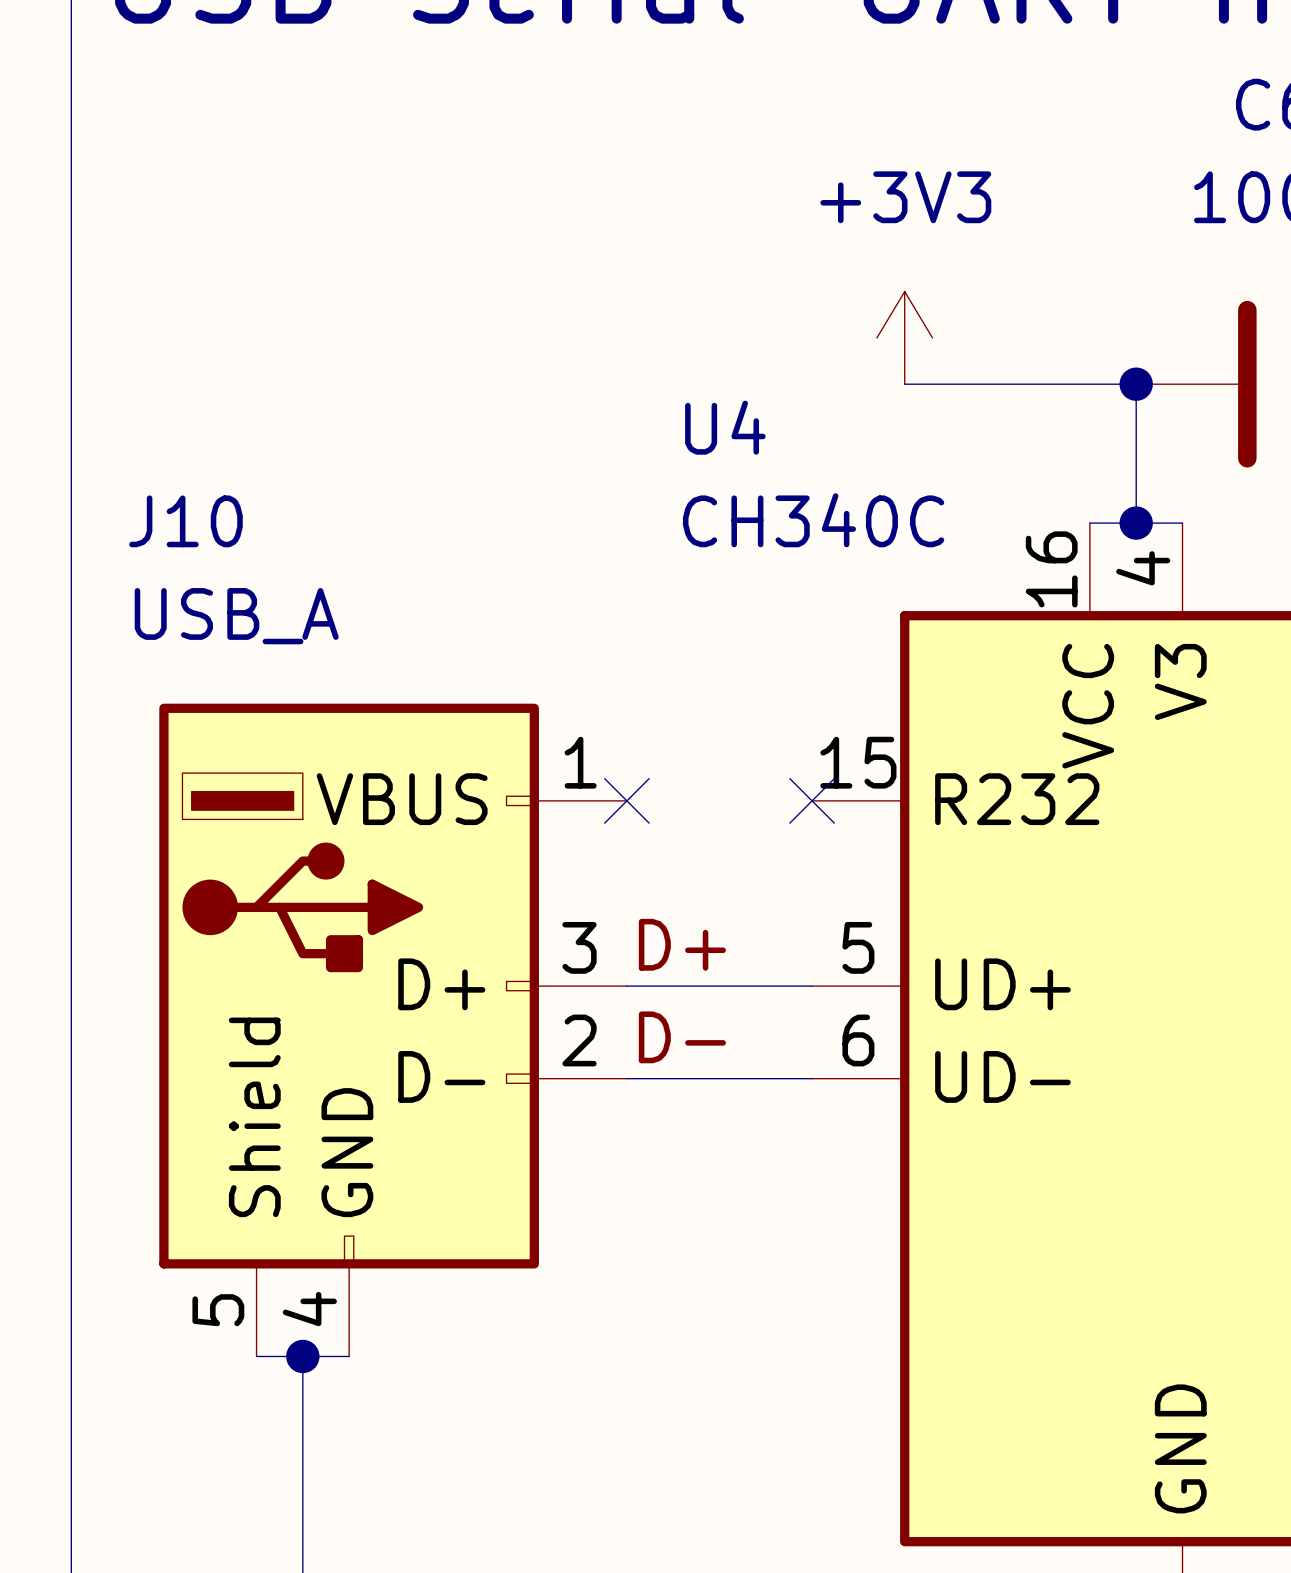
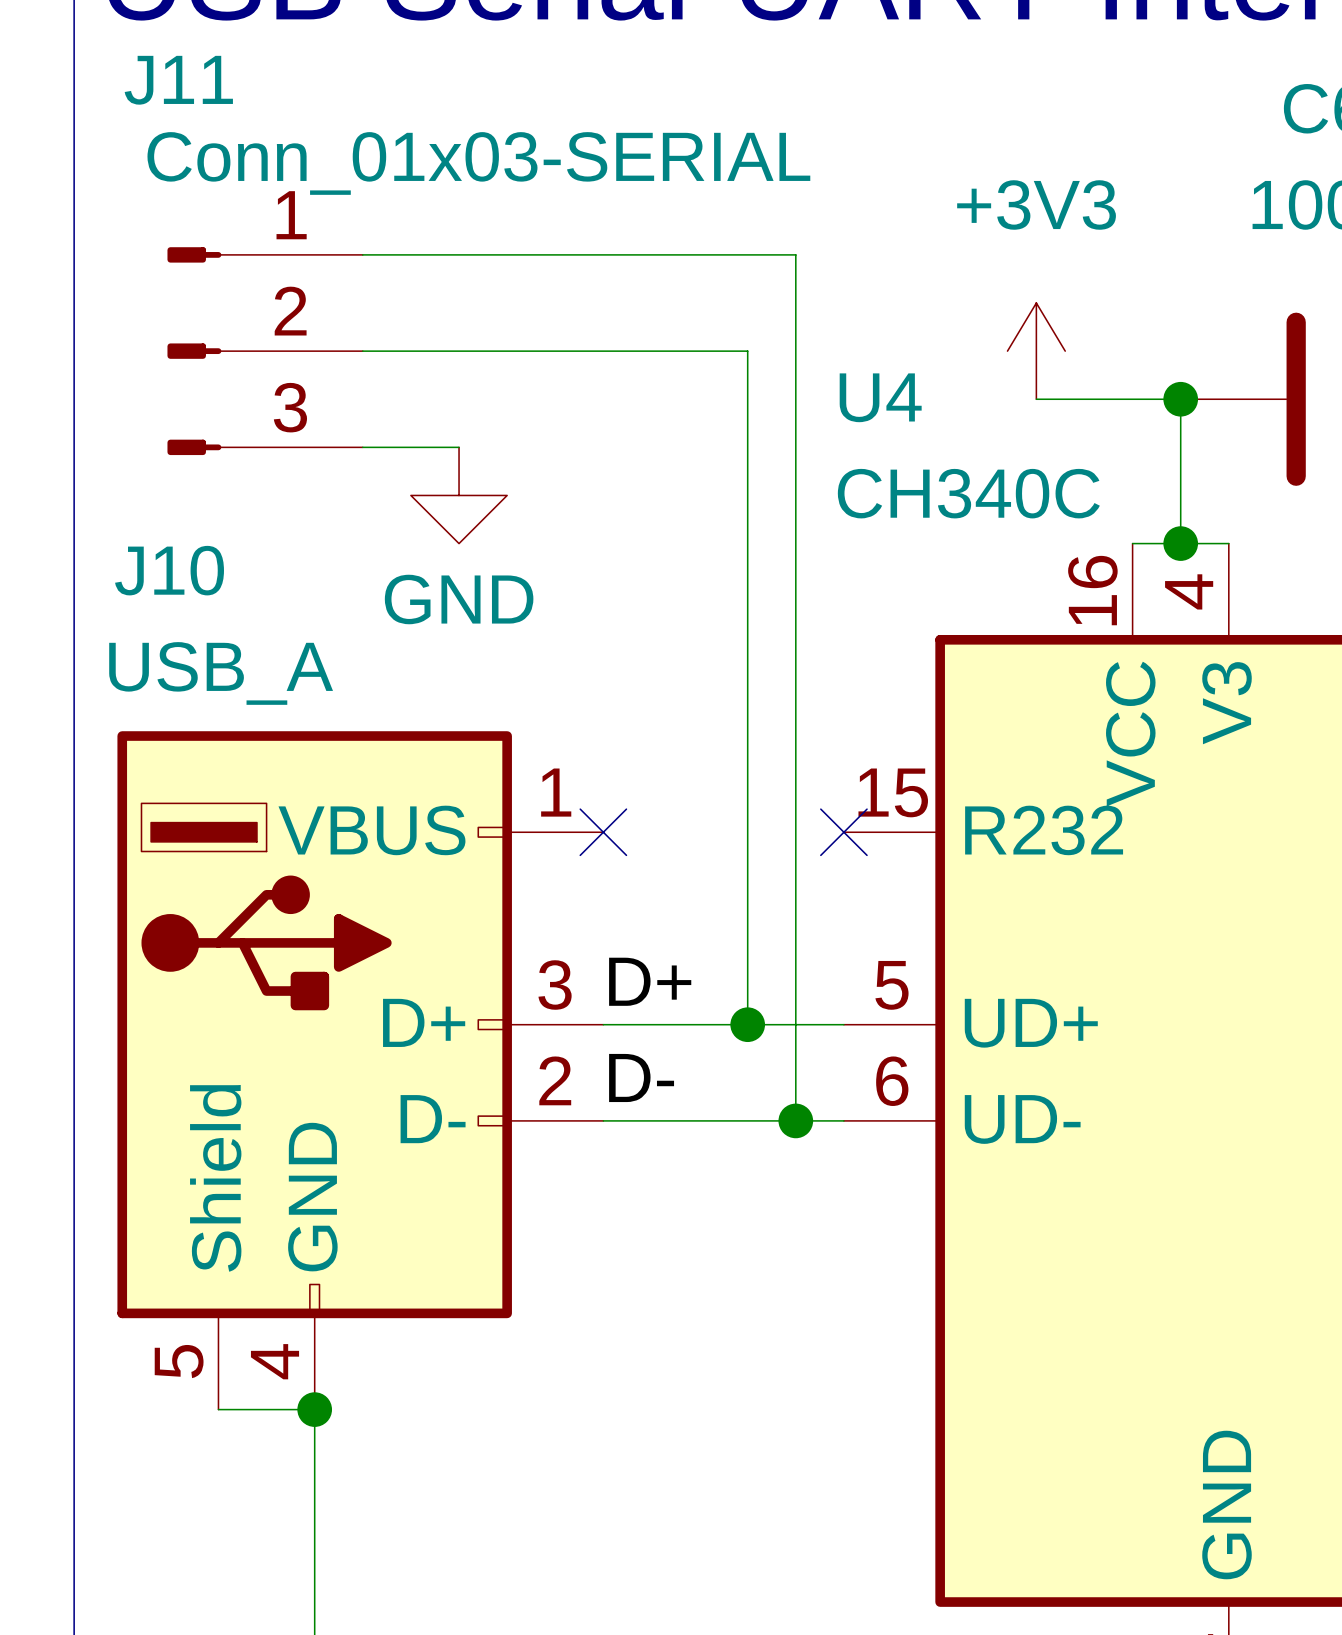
wire: none -> (362, 254) (795, 254) (795, 1120)
J11: none -> Conn_01x03-SERIAL (265, 351)
wire: none -> (362, 351) (747, 351) (747, 1024)
power symbol position: +3V3 (904, 337) -> +3V3 (1036, 351)
wire: (904, 384) (997, 384) -> (362, 447) (459, 447)
U4 name position: U4 (725, 427) -> U4 (880, 397)
power symbol: none -> GND (459, 495)
U4 value position: CH340C (813, 520) -> CH340C (968, 493)
J10 name position: J10 (185, 521) -> J10 (169, 570)
J10 value position: USB_A (236, 616) -> USB_A (221, 673)
no-connect mark position: (626, 800) -> (603, 832)
label position: D+ (682, 944) -> D+ (650, 981)
junction: none -> (747, 1024)
J10 position: (393, 1030) -> (360, 1070)
label position: D- (682, 1037) -> D- (641, 1077)
junction: none -> (795, 1120)
wire: (302, 1356) (349, 1356) -> (218, 1409) (266, 1409)

